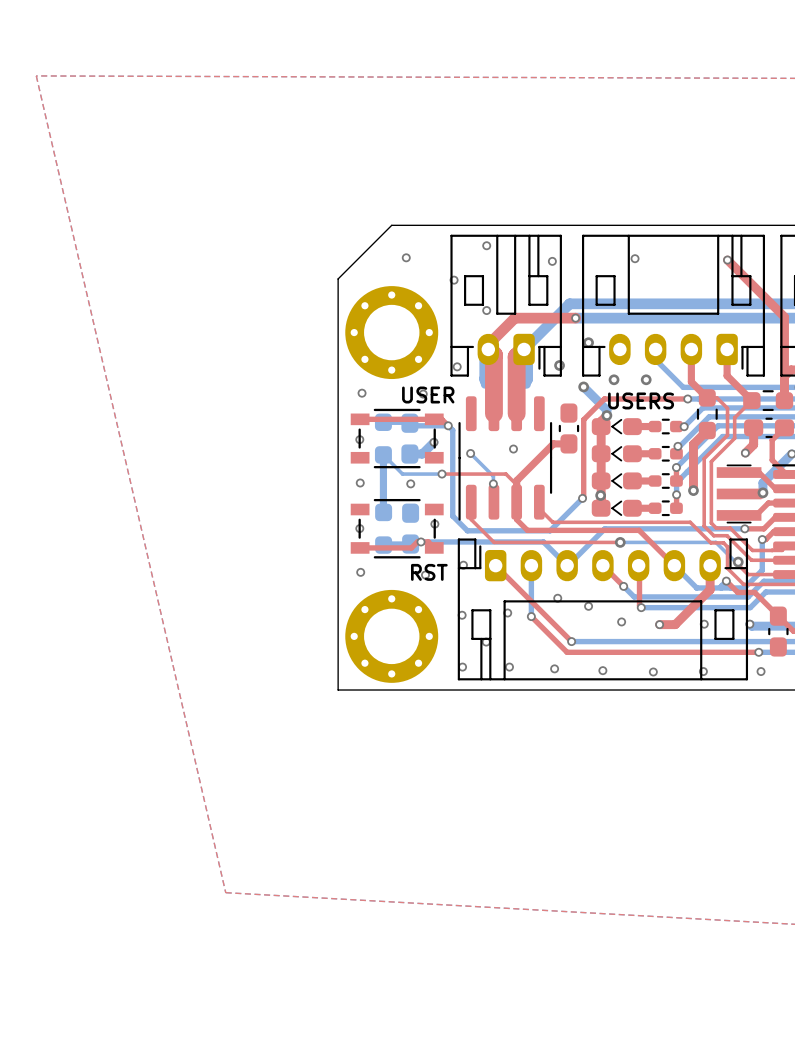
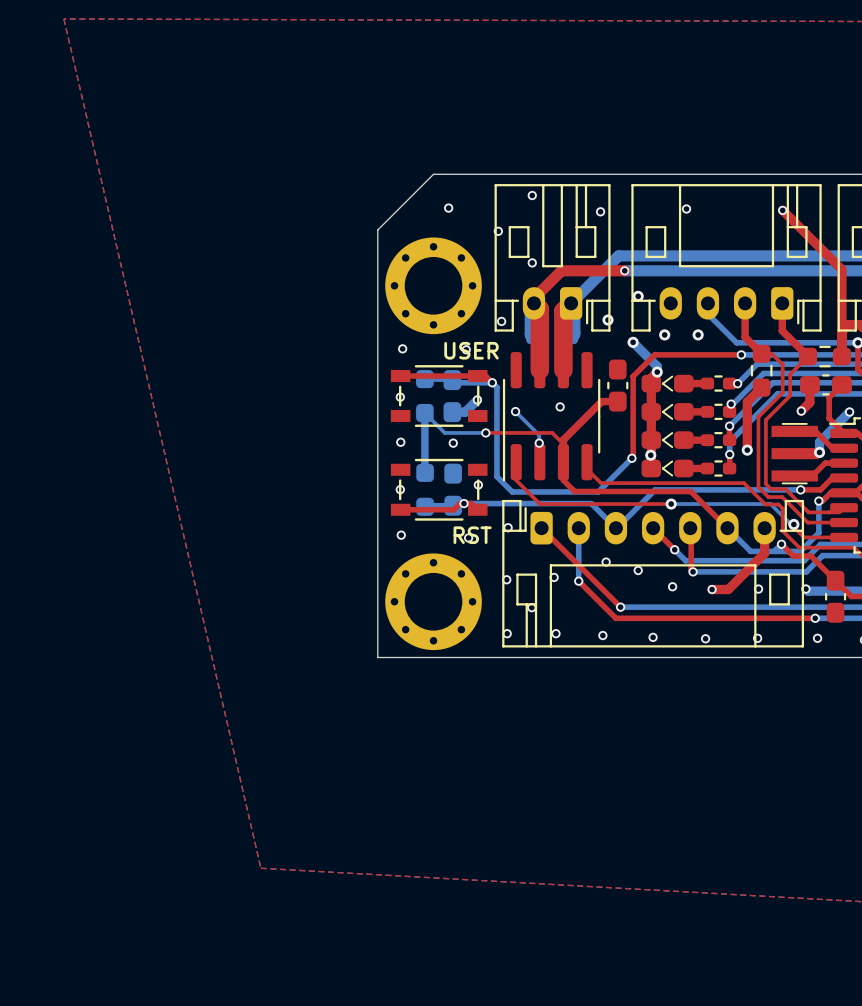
text: USERS (641, 400) -> none

